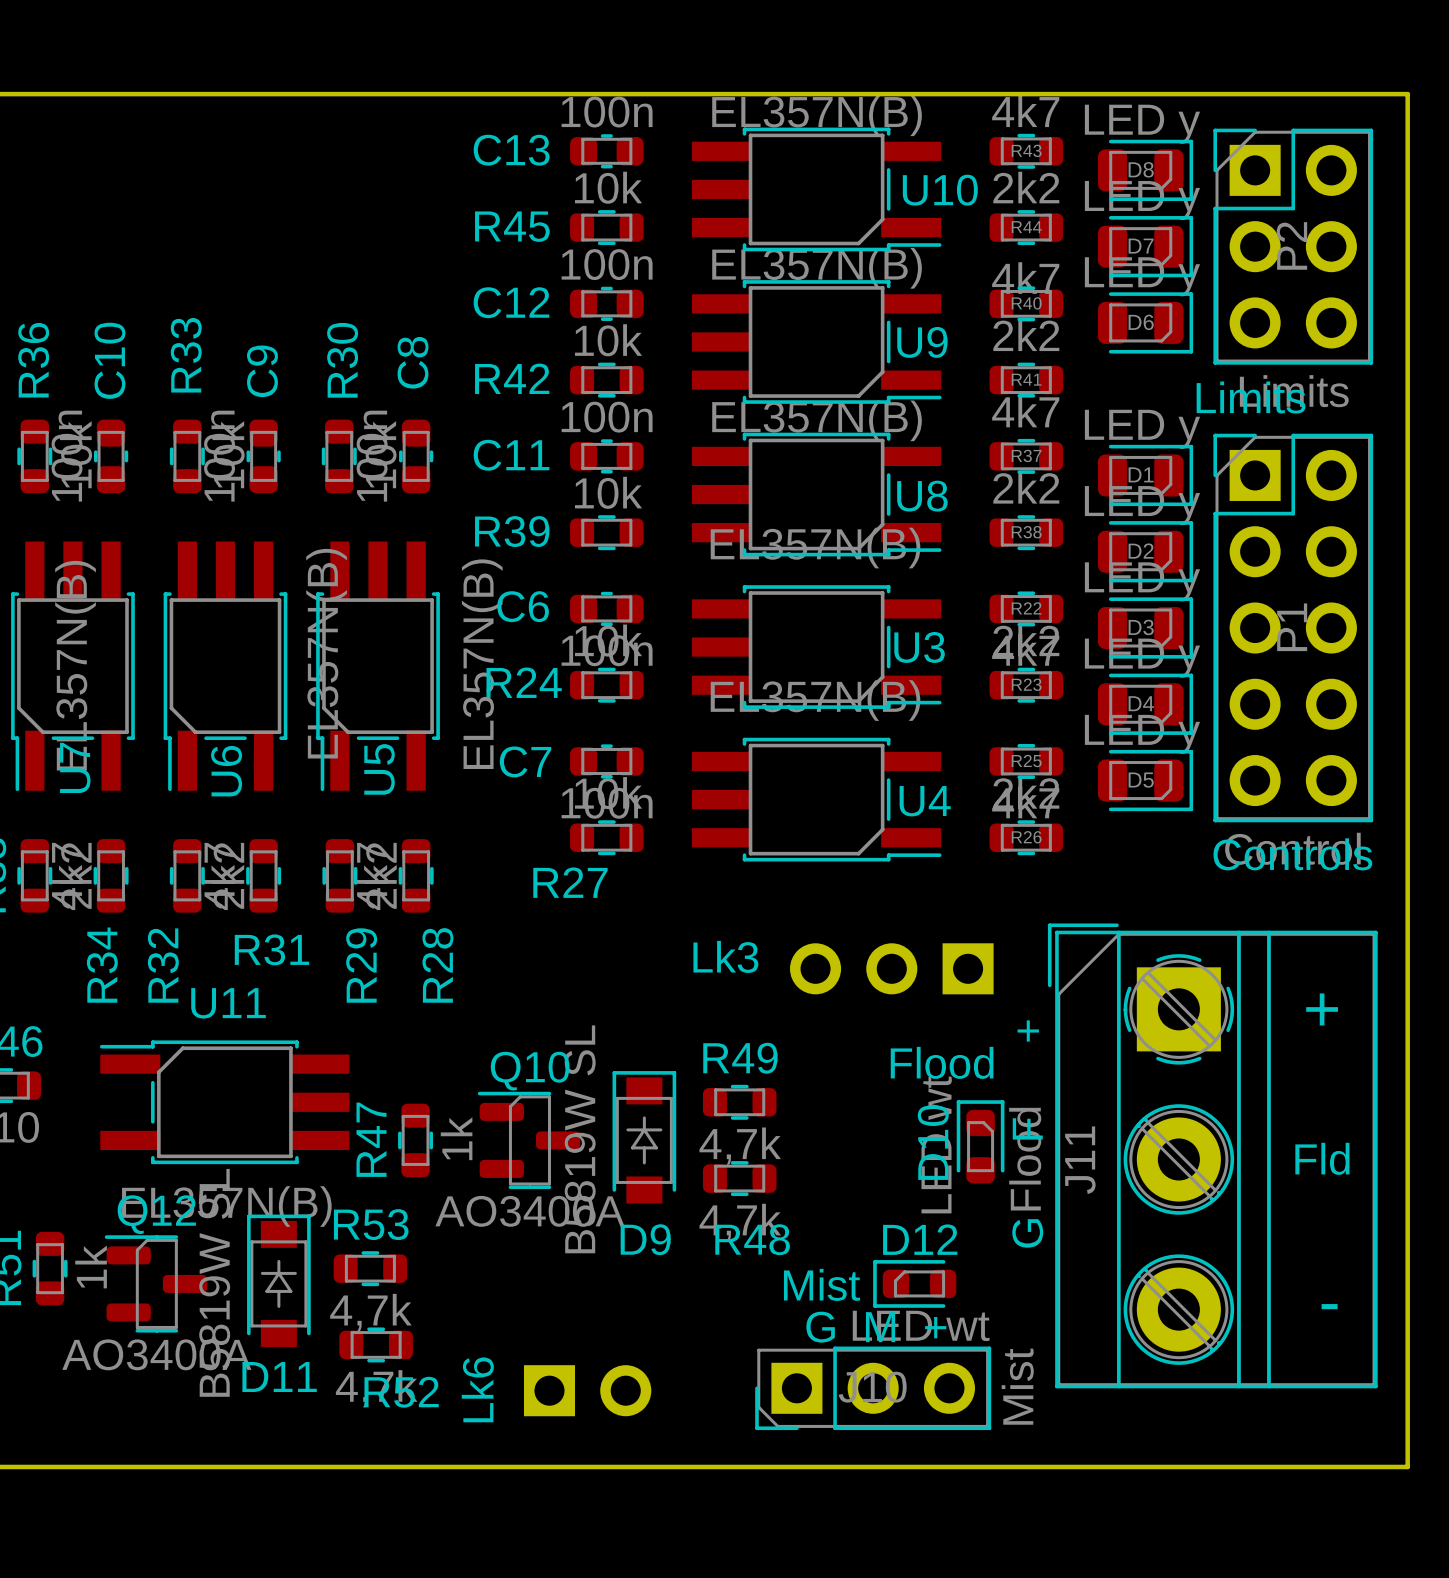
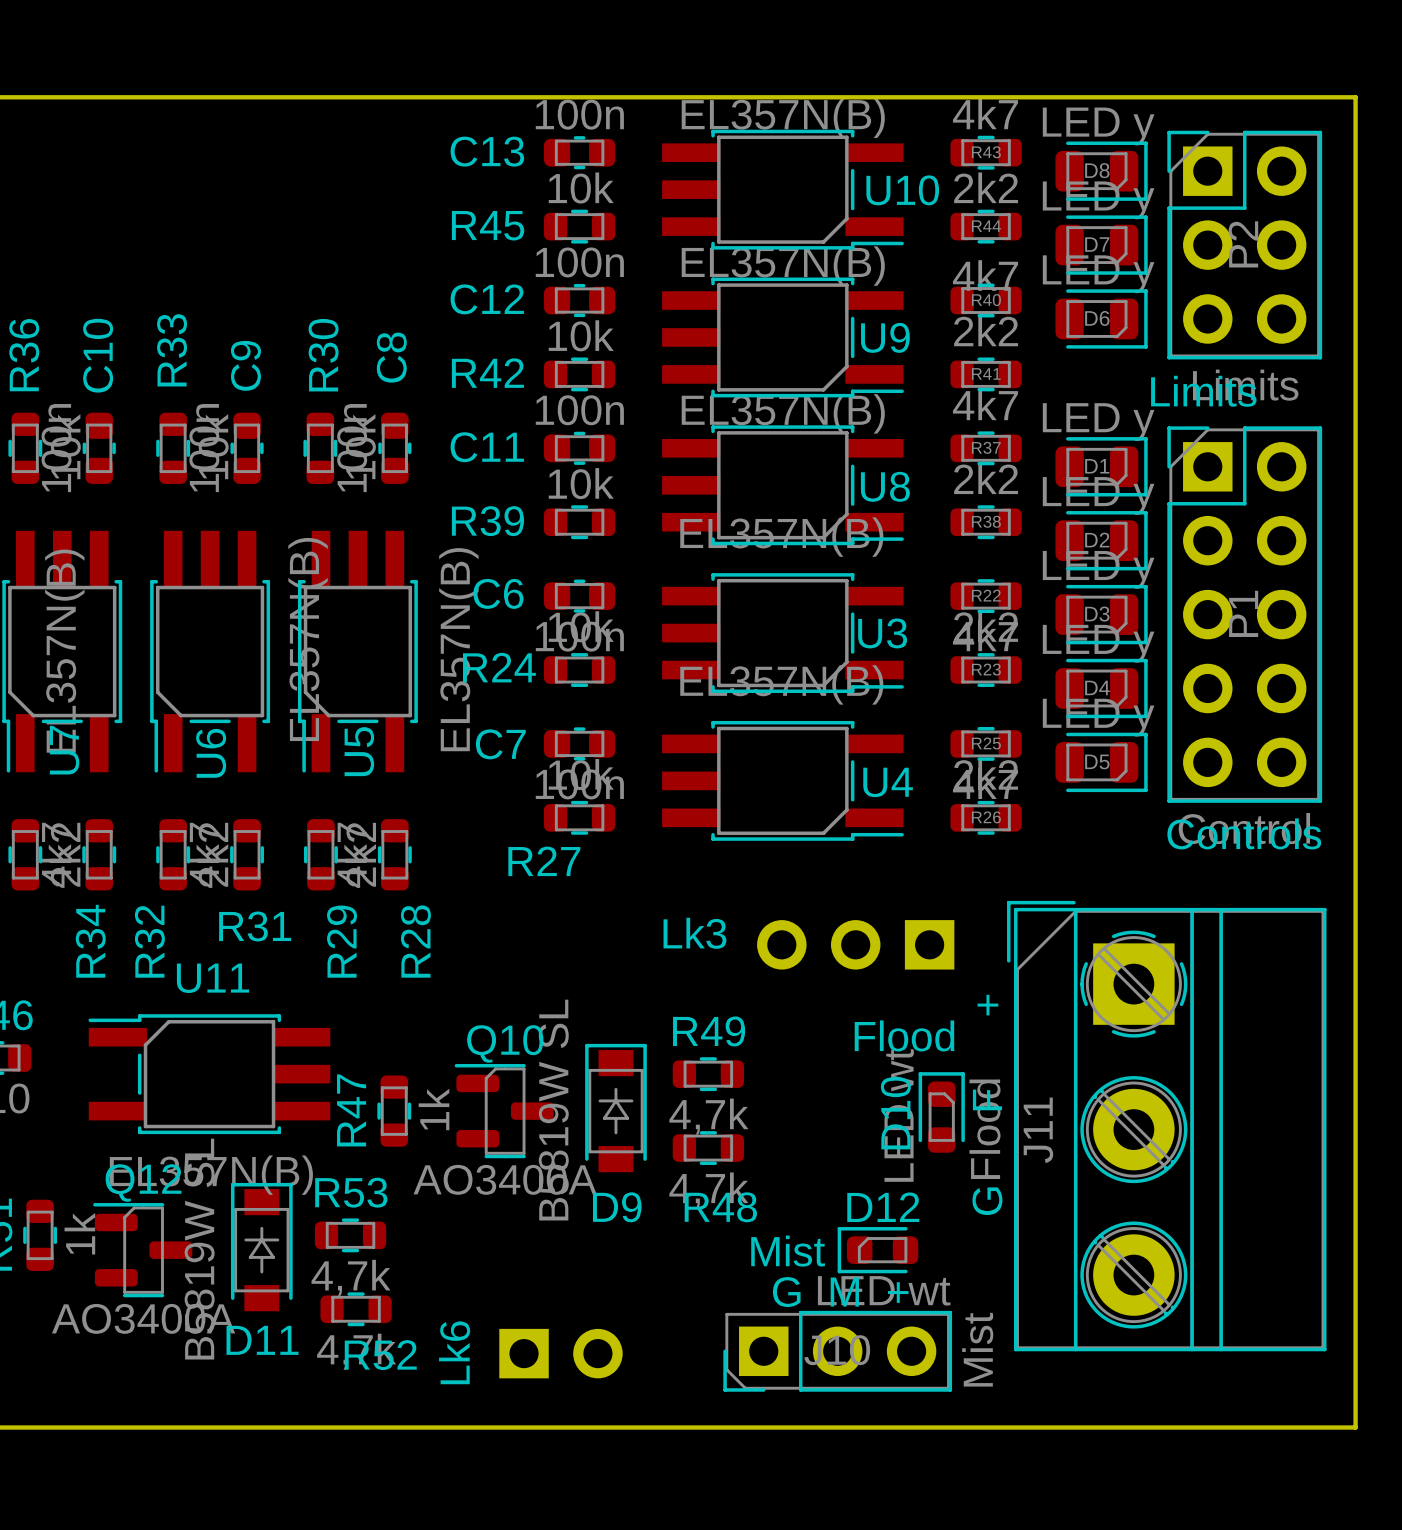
text: + (1322, 1009) -> none
text: Fld (1322, 1158) -> none
text: - (1329, 1306) -> none

